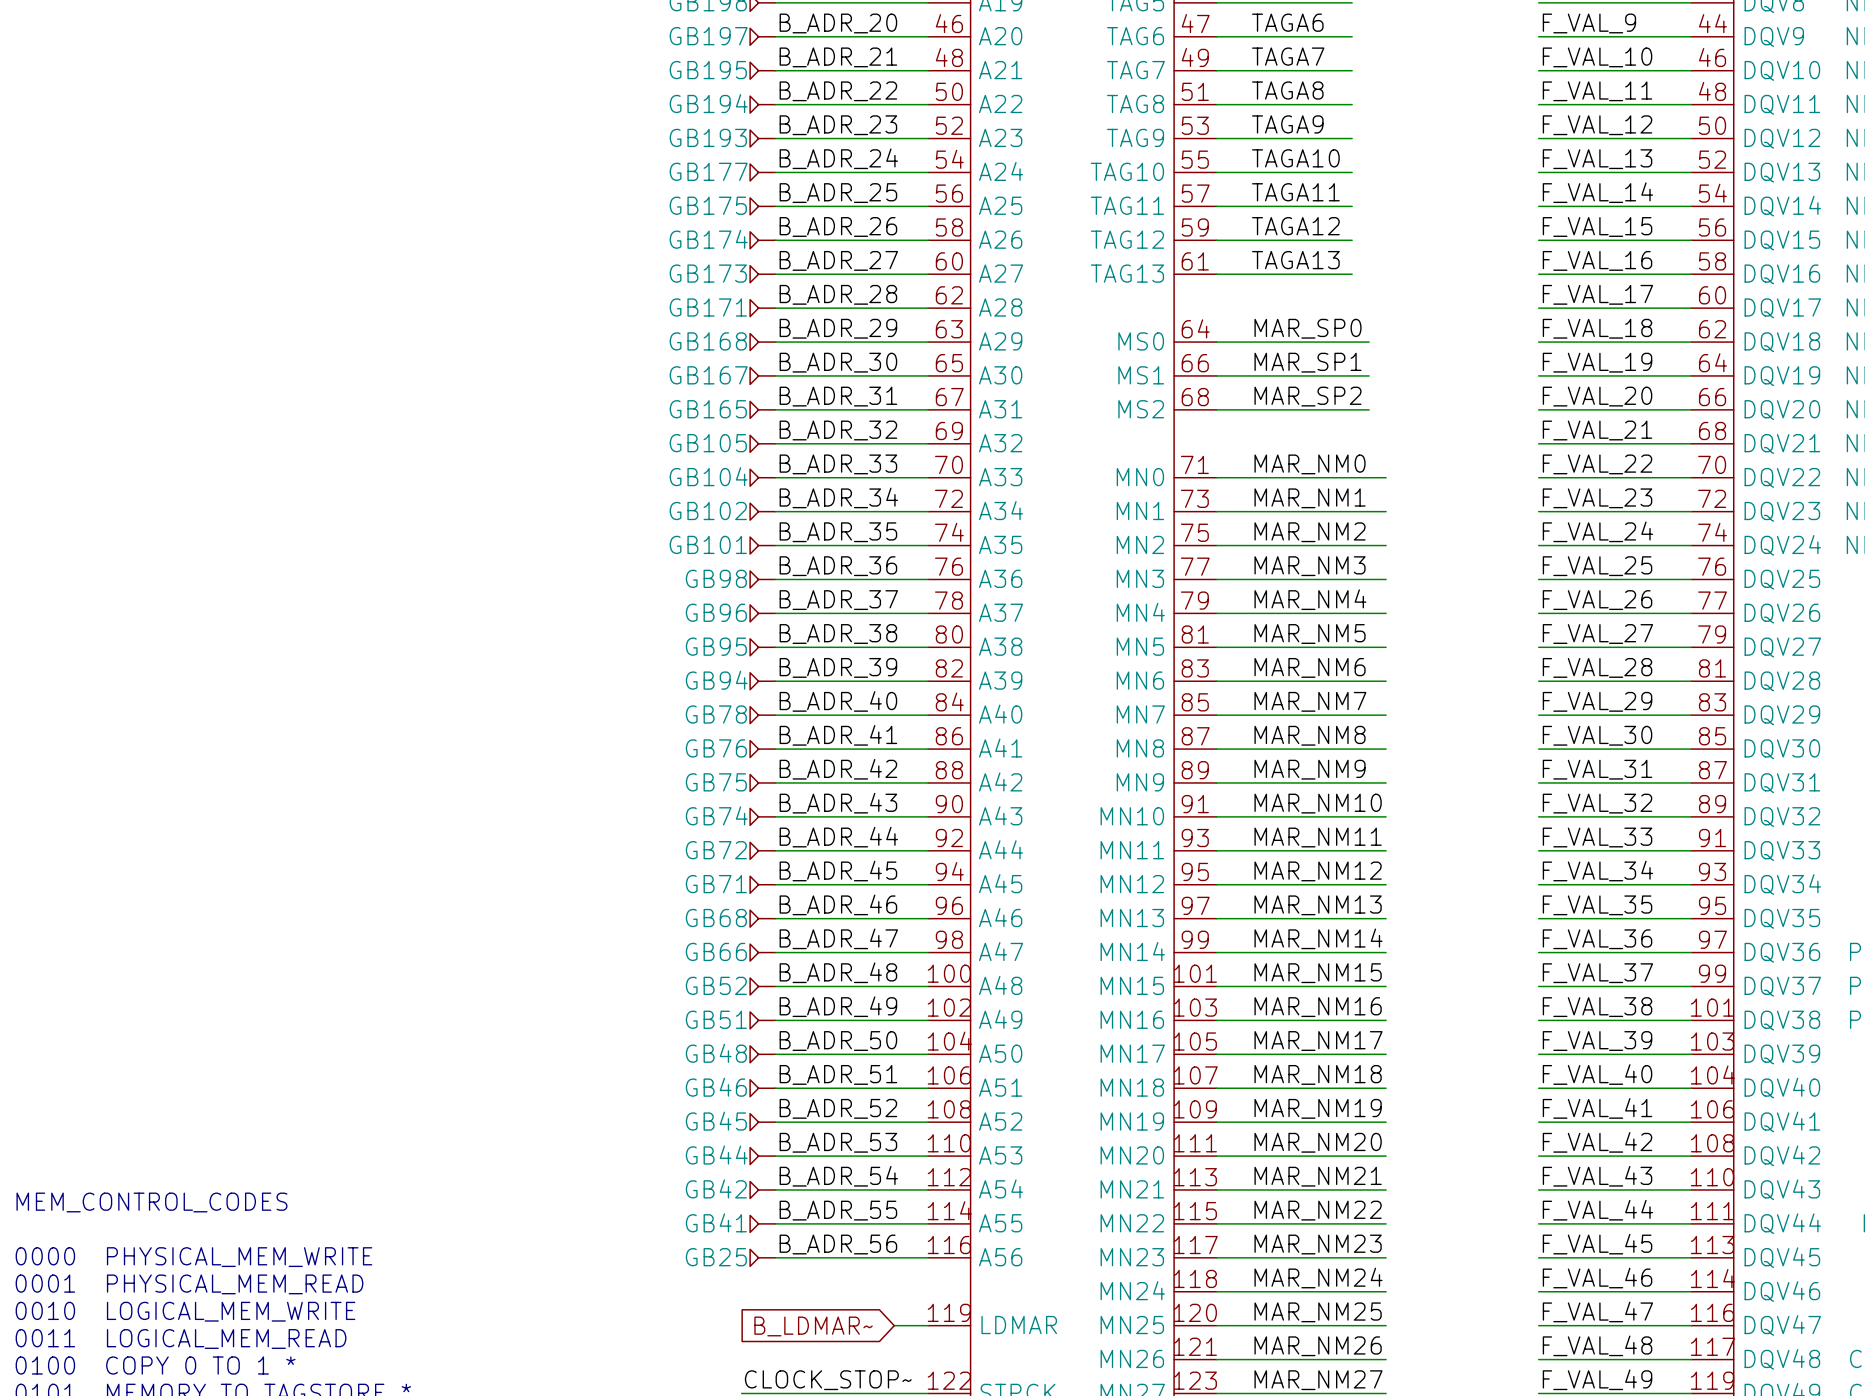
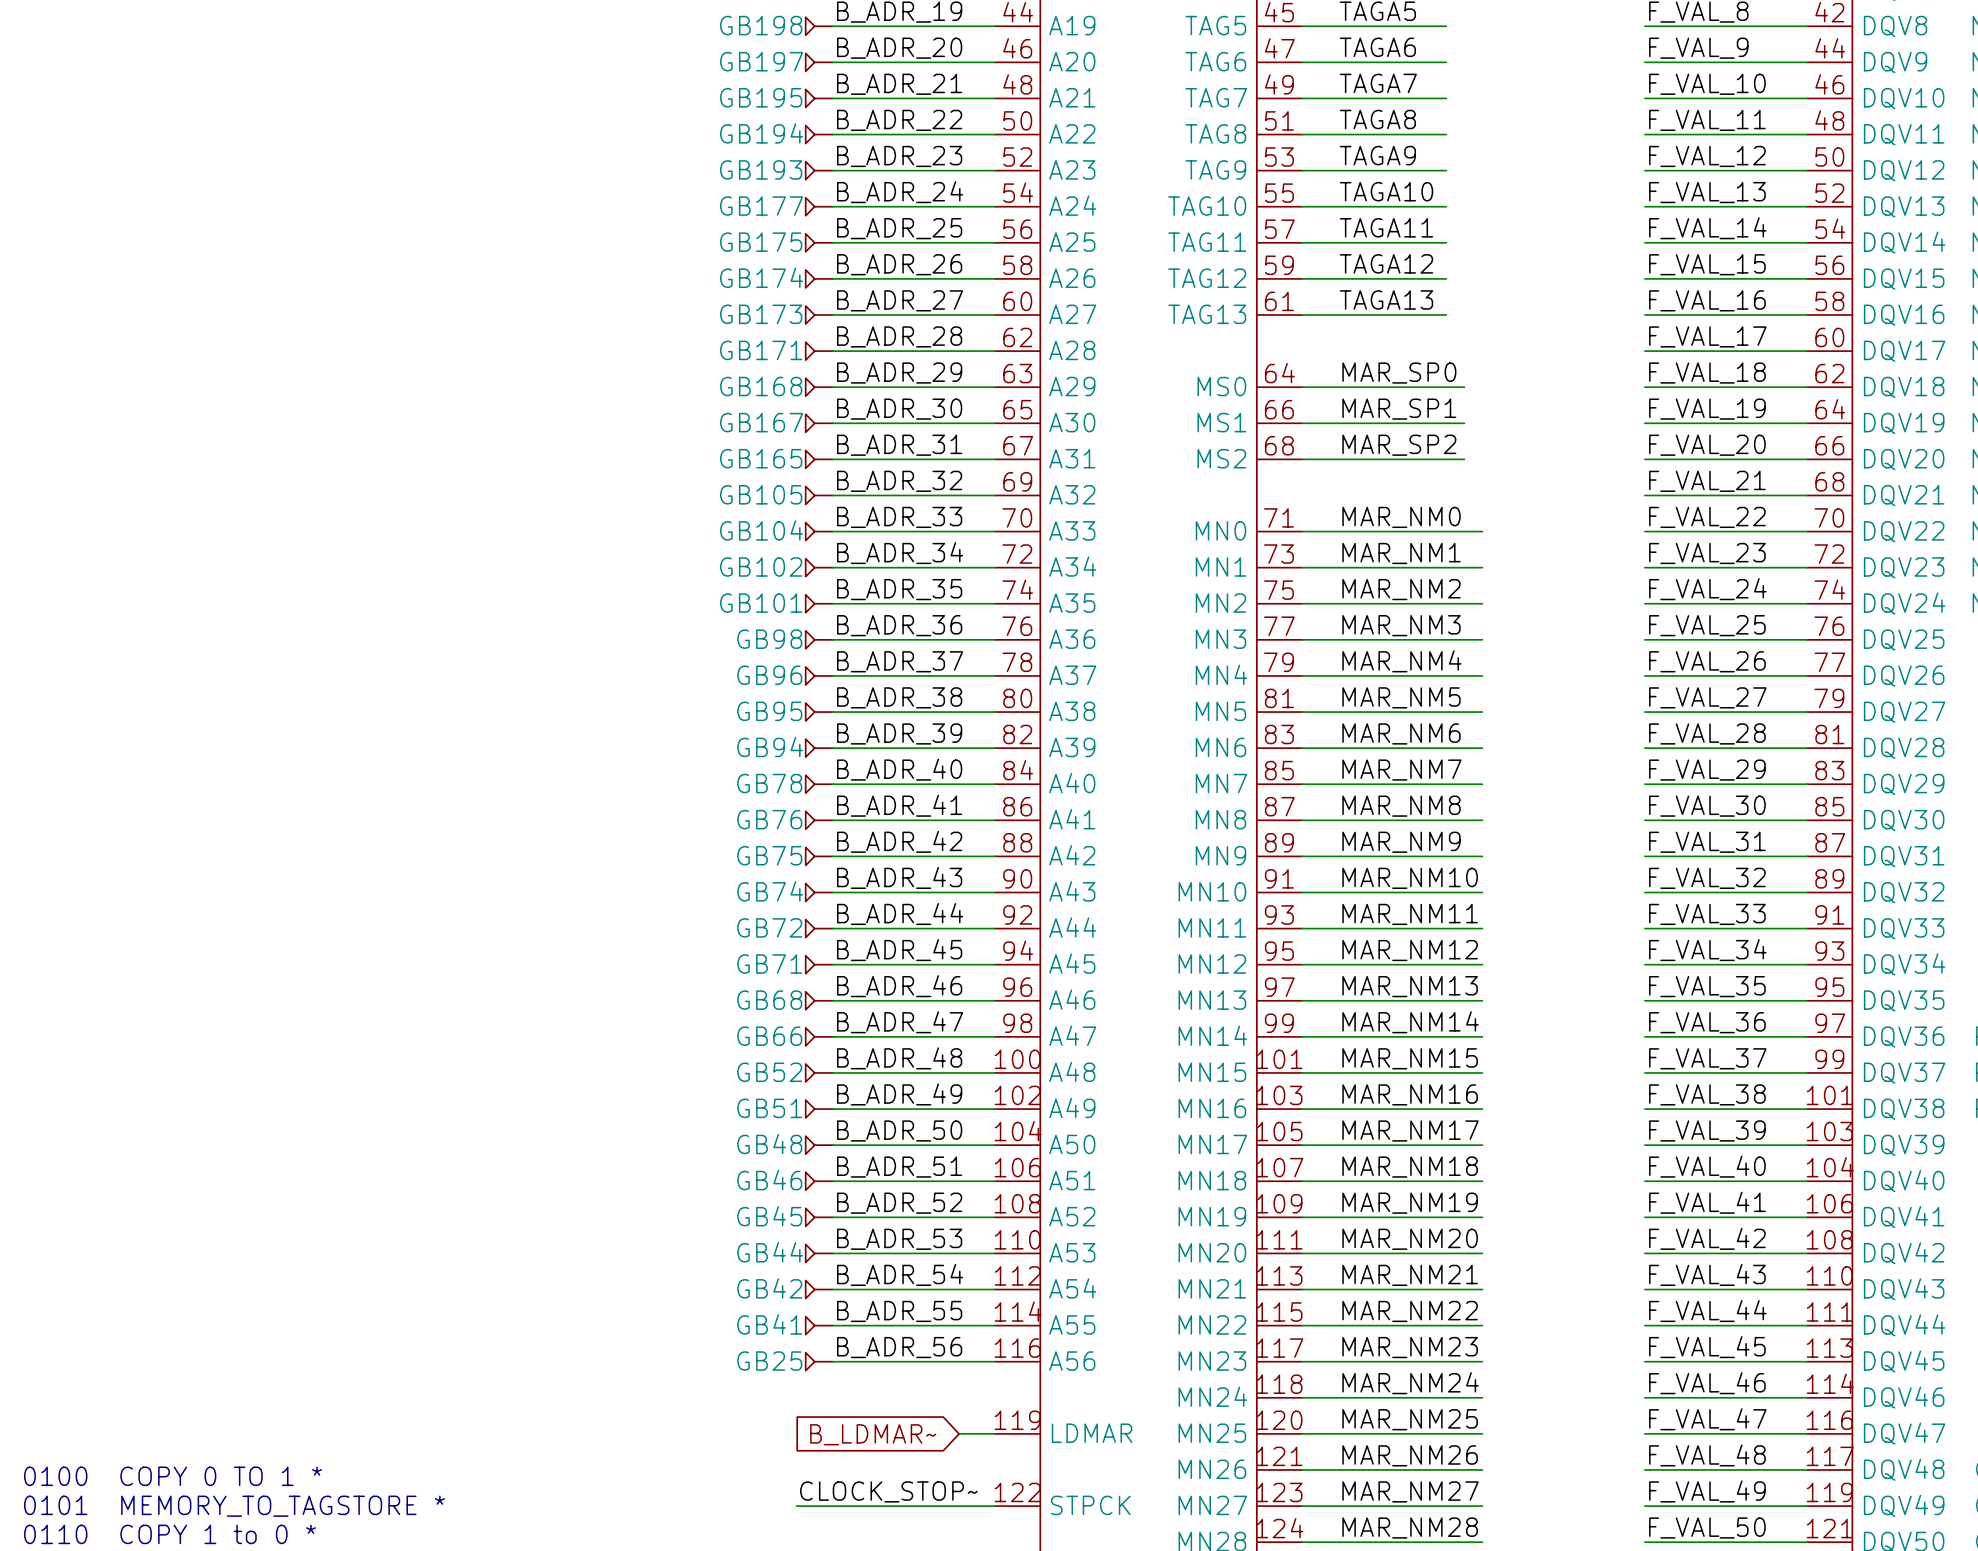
text: MEM_CONTROL_CODES (151, 1202) -> none
text: 0000 PHYSICAL_MEM_WRITE (193, 1257) -> none
text: 0001 PHYSICAL_MEM_READ (189, 1284) -> none
text: 0010 LOGICAL_MEM_WRITE (185, 1311) -> none
text: 0011 LOGICAL_MEM_READ (181, 1339) -> none

